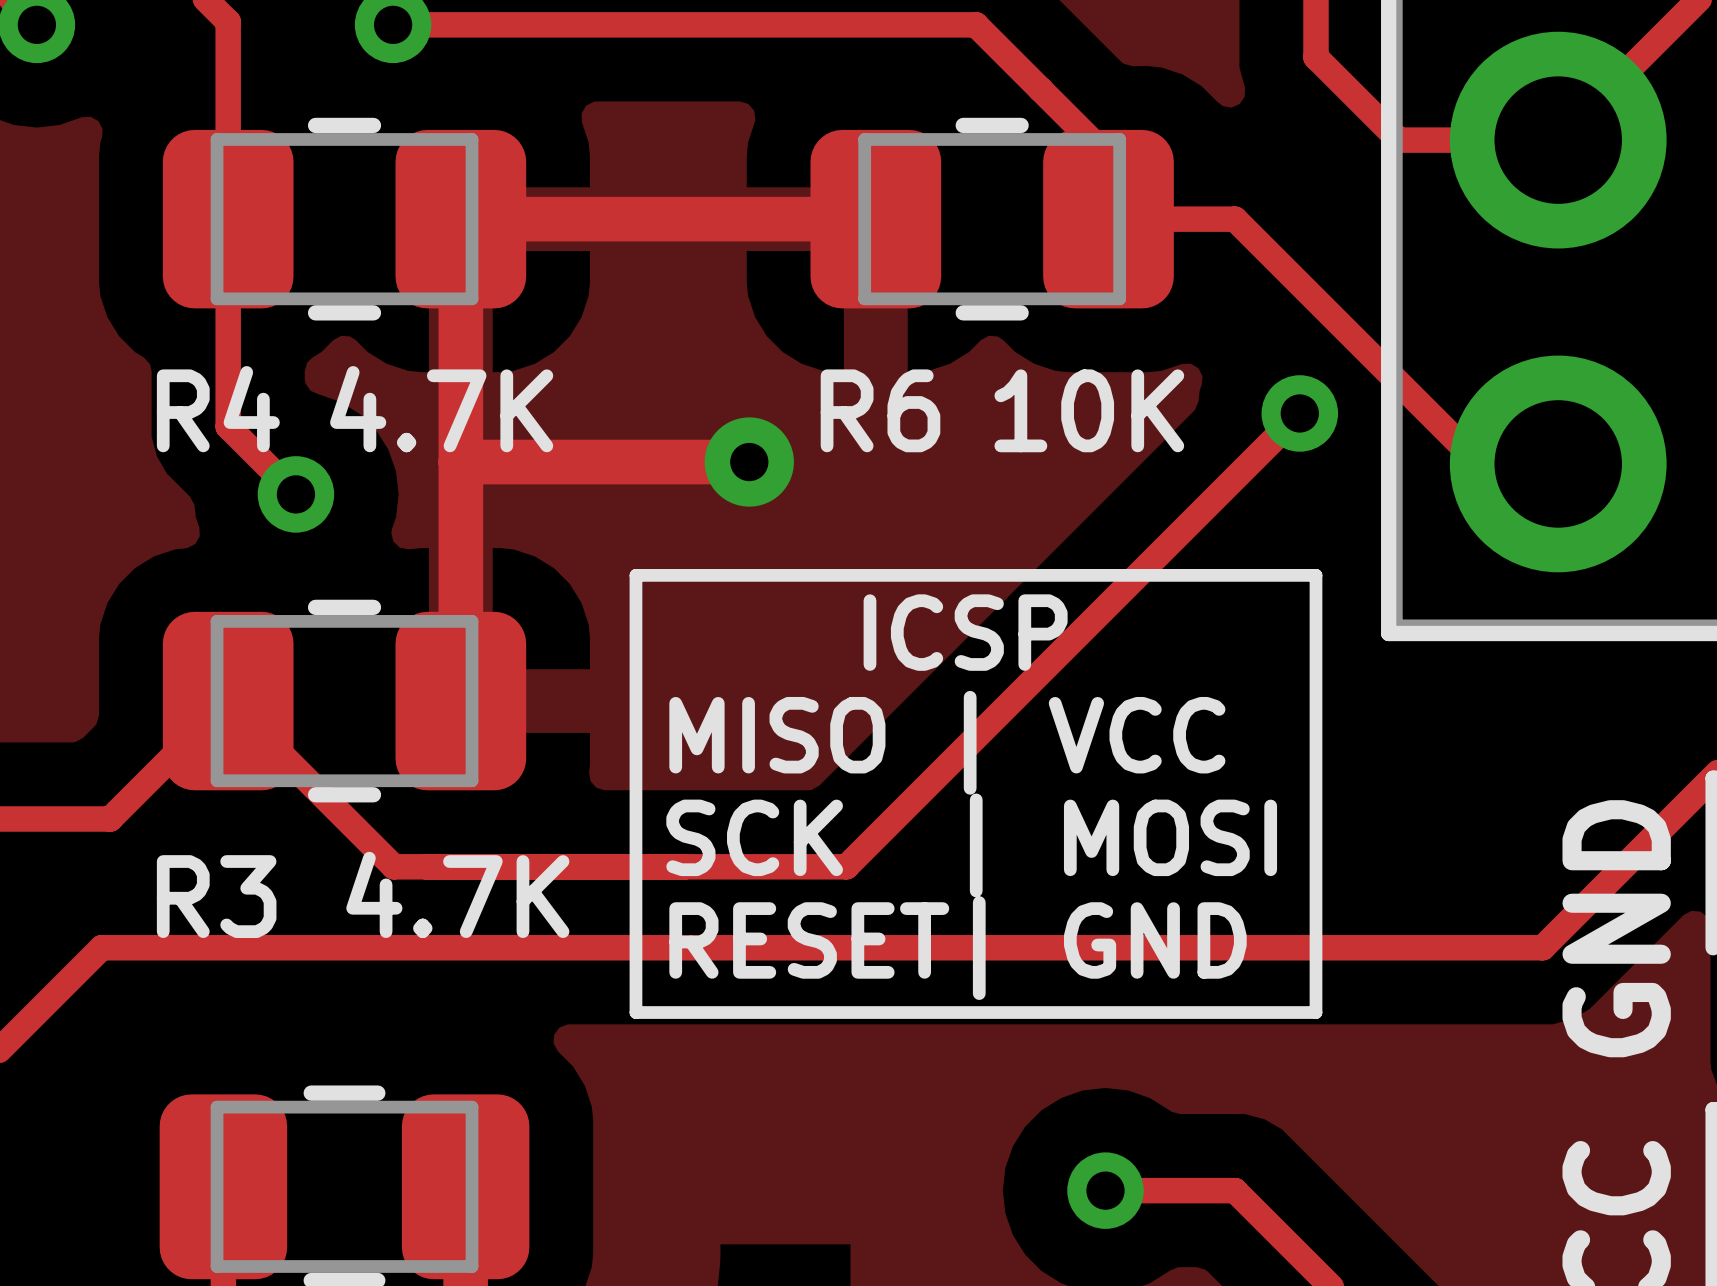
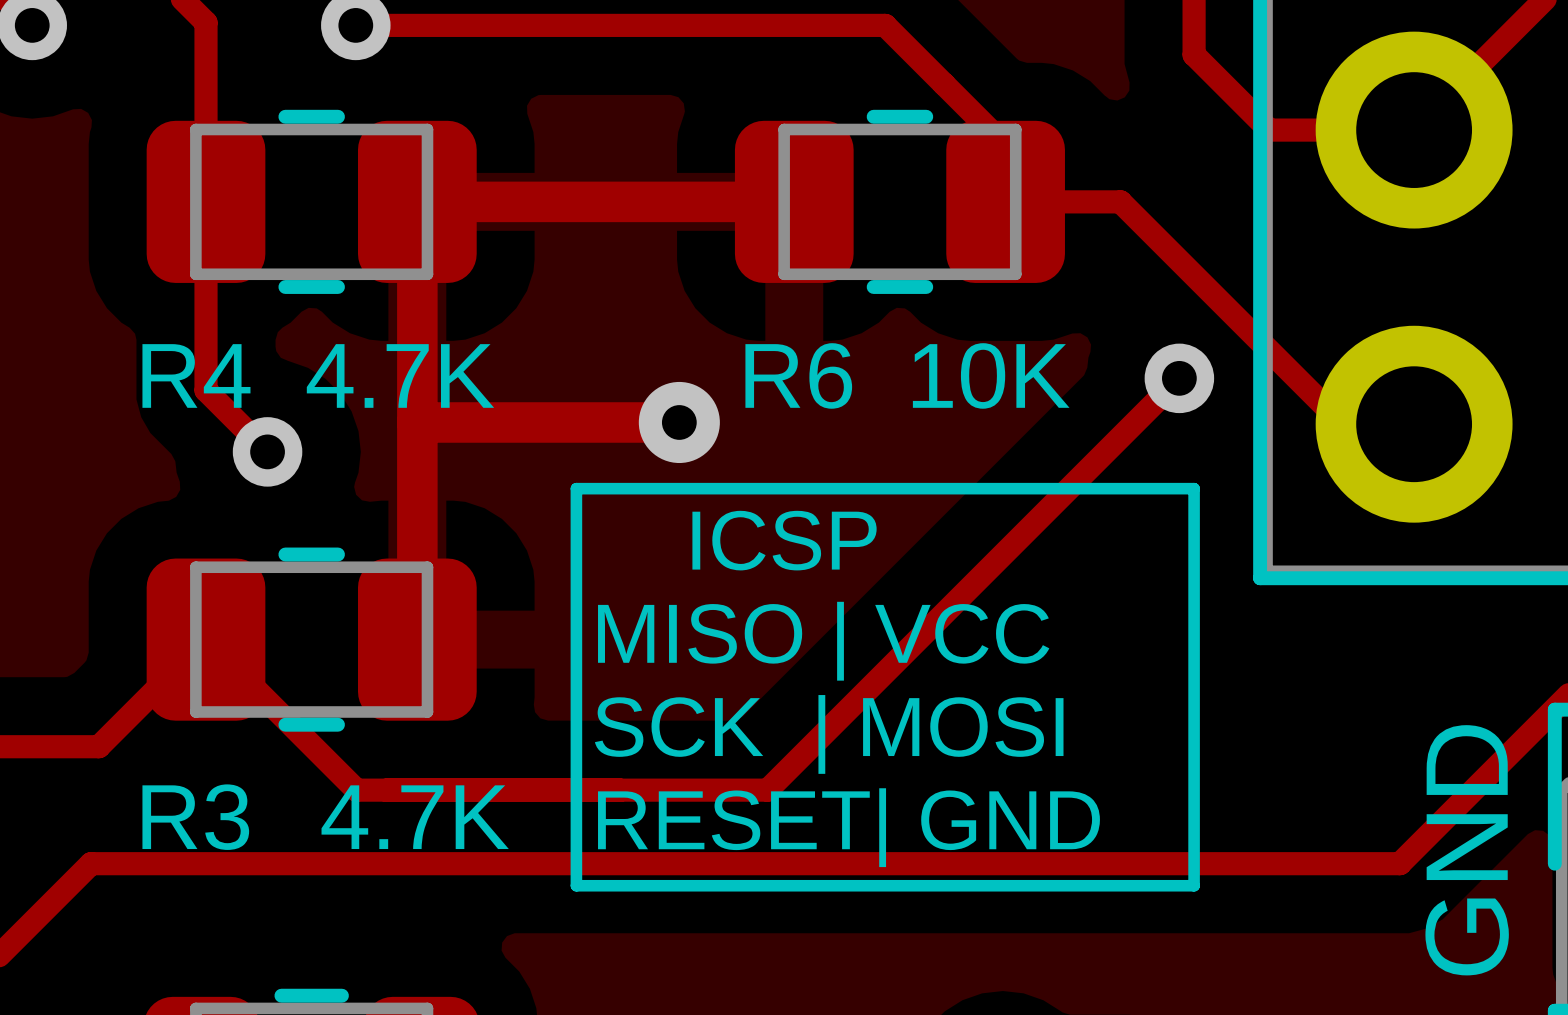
line: (635, 575) (1315, 575) -> (576, 525) (576, 488) (1194, 488) (1194, 525)
text position: ICSP (965, 632) -> ICSP (784, 540)
text position: MISO | VCC (947, 742) -> MISO | VCC (823, 641)
text position: SCK | MOSI (971, 845) -> SCK | MOSI (829, 734)
text position: RESET| GND (958, 948) -> RESET| GND (848, 827)
line: (635, 972) (635, 1012) (1315, 1012) (1315, 972) -> (576, 885) (1194, 885)

